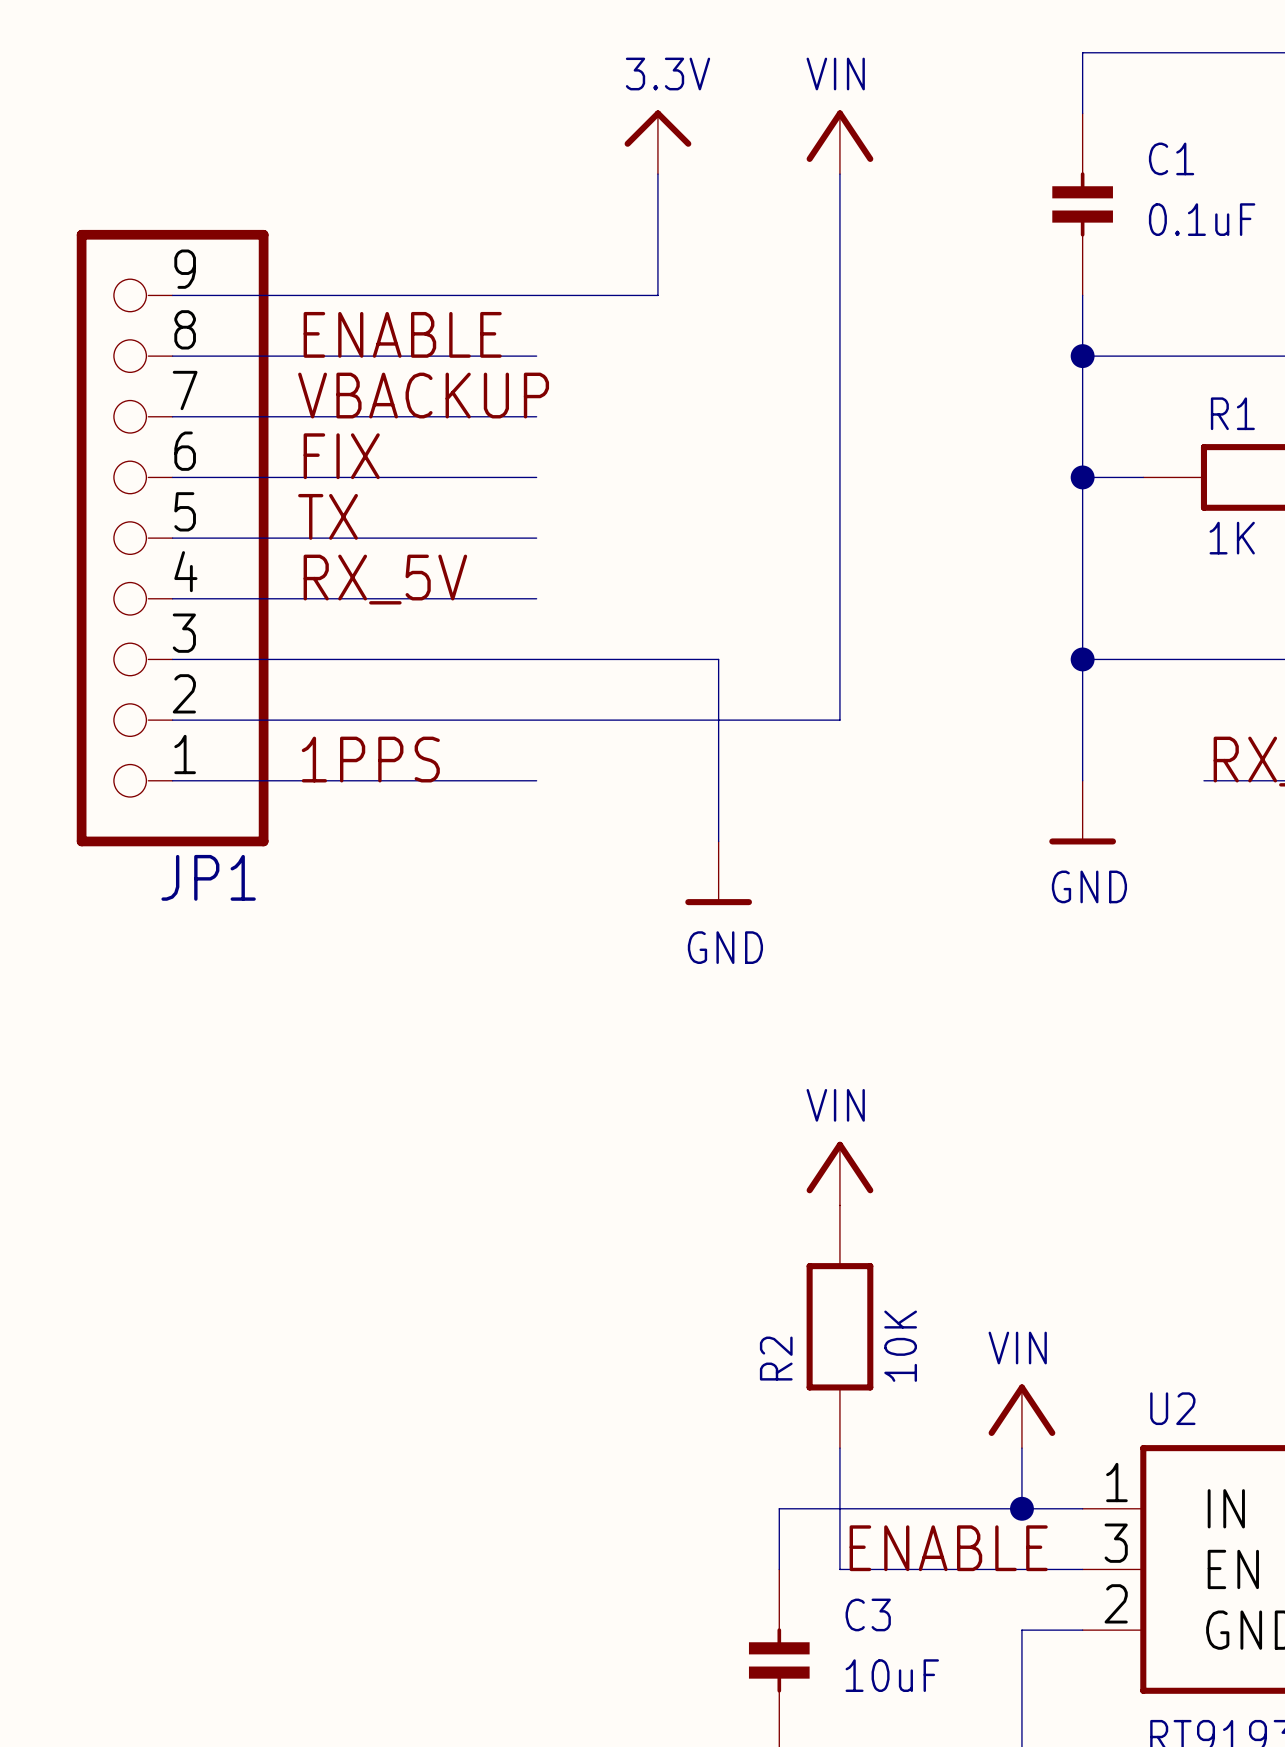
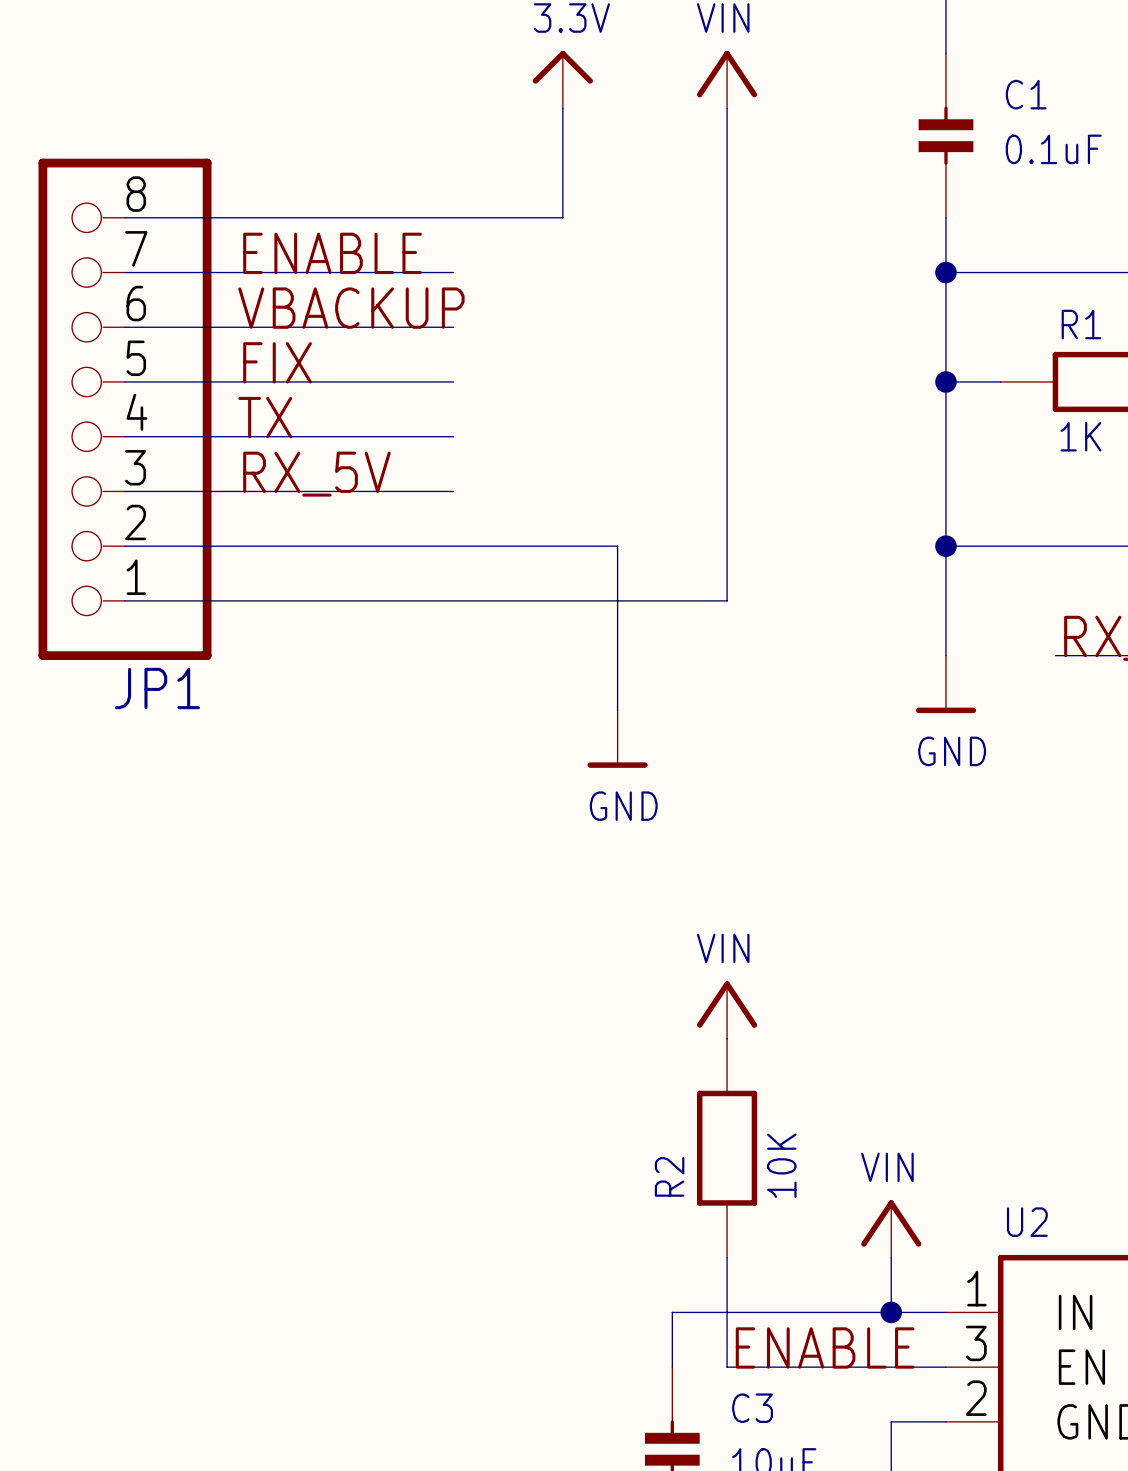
JP1 symbol: [76, 229, 269, 847] -> [38, 158, 212, 661]
label: 1PPS (370, 759) -> none
wire: (172, 780) (536, 780) -> none

